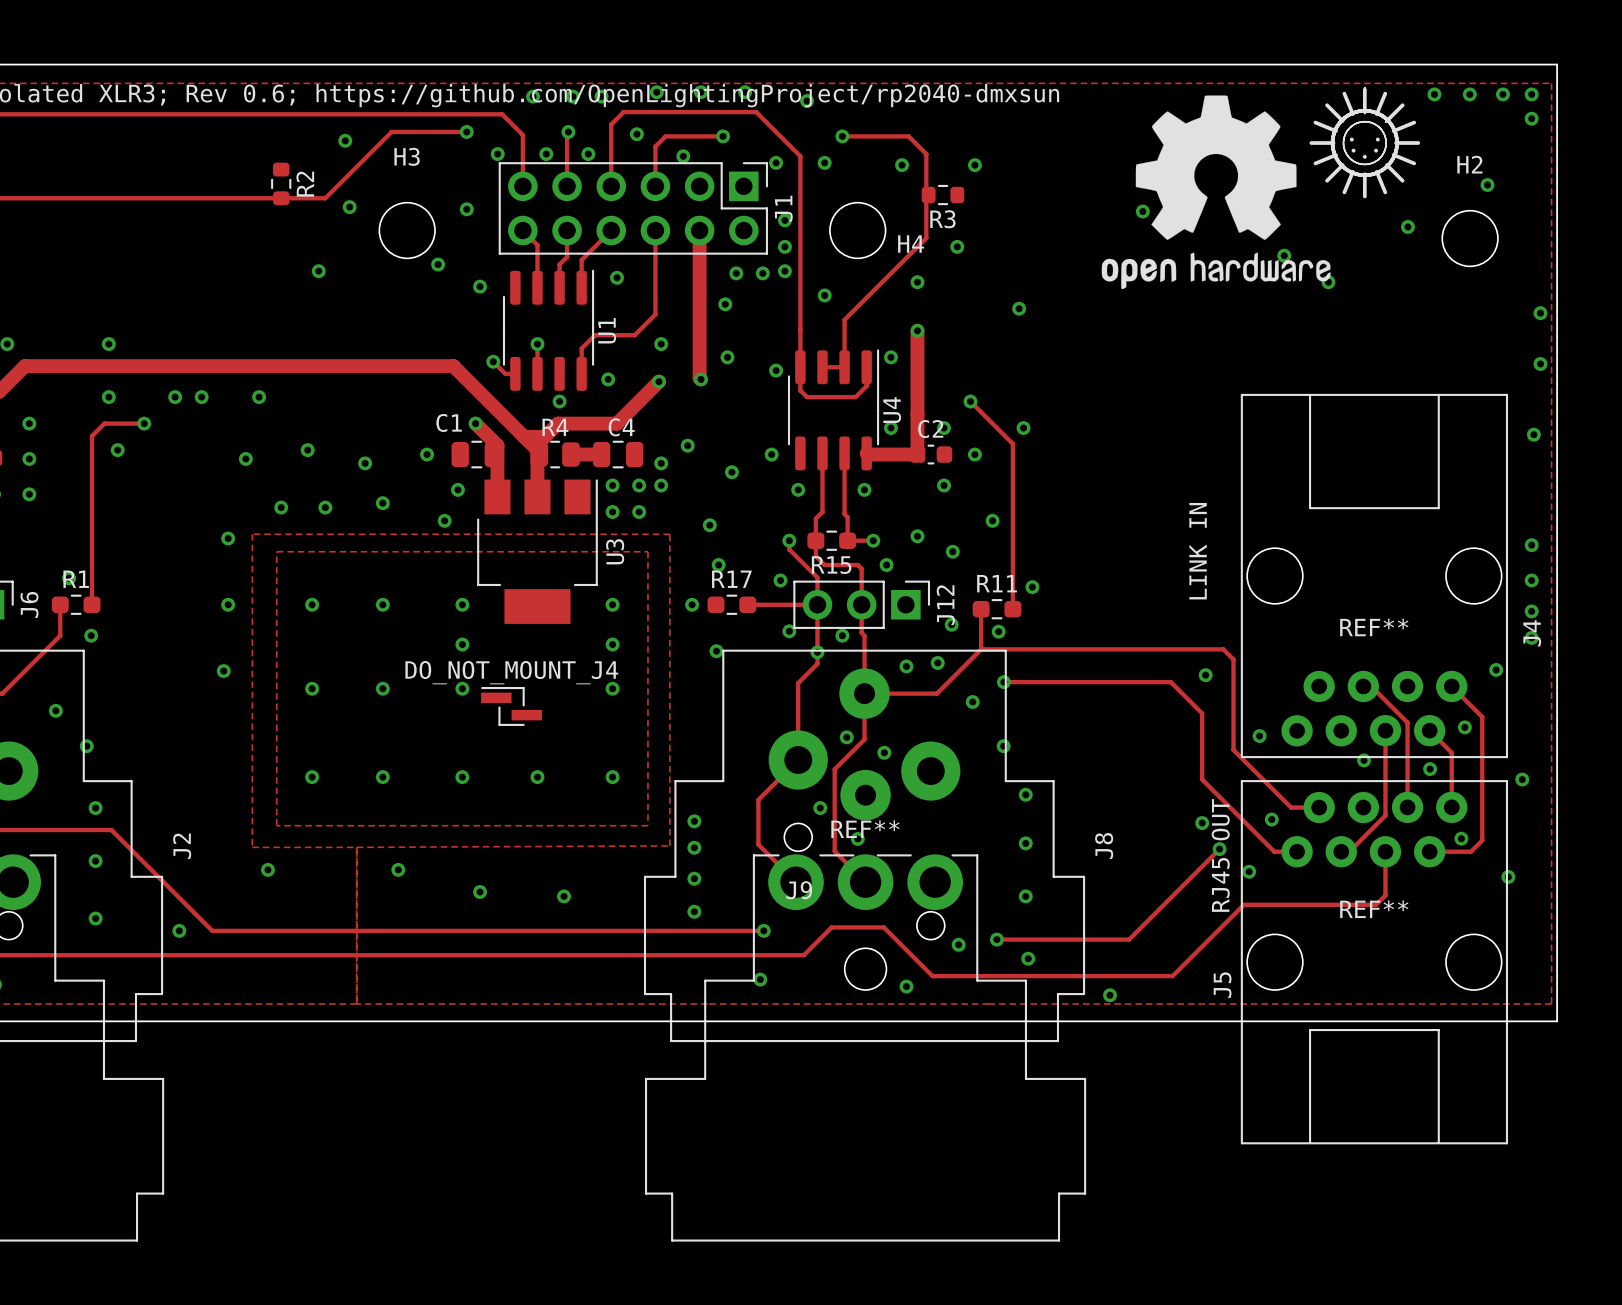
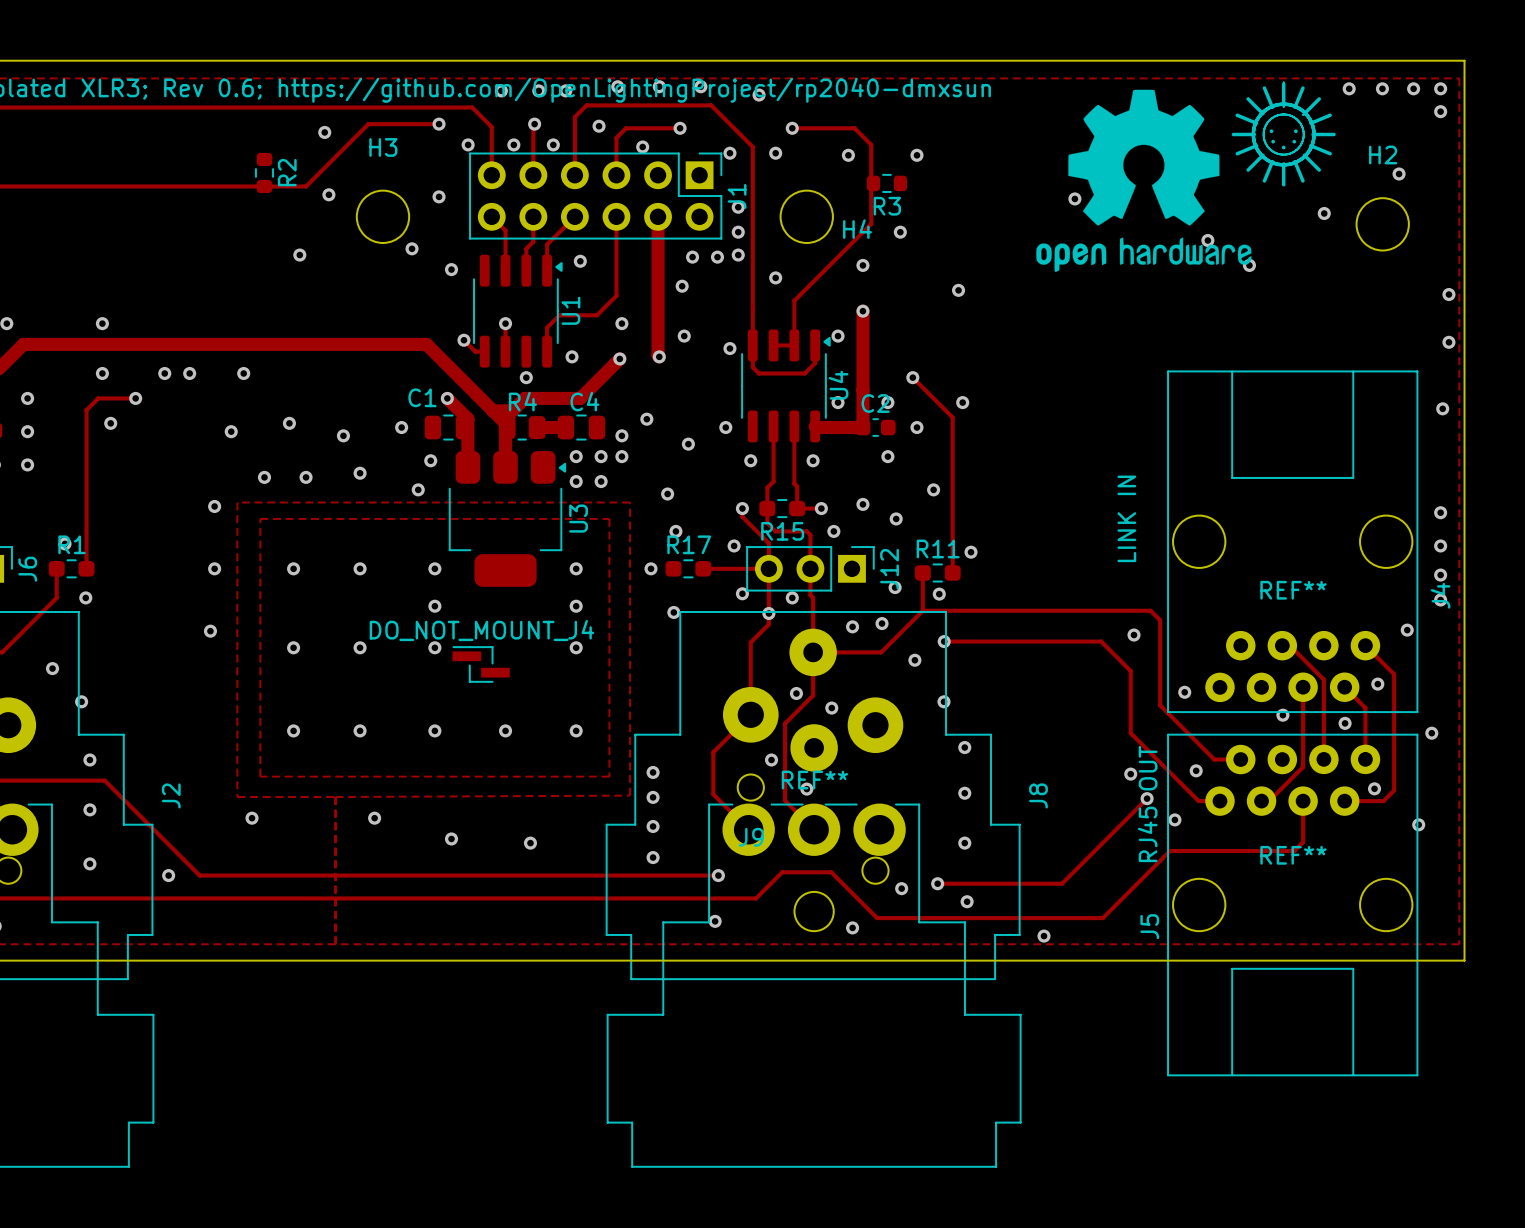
U1 footprint: [502, 269, 595, 391] -> [473, 254, 563, 368]
U4 footprint: [787, 349, 880, 471] -> [741, 329, 831, 443]
U3 footprint: [477, 479, 598, 624] -> [448, 451, 567, 587]

